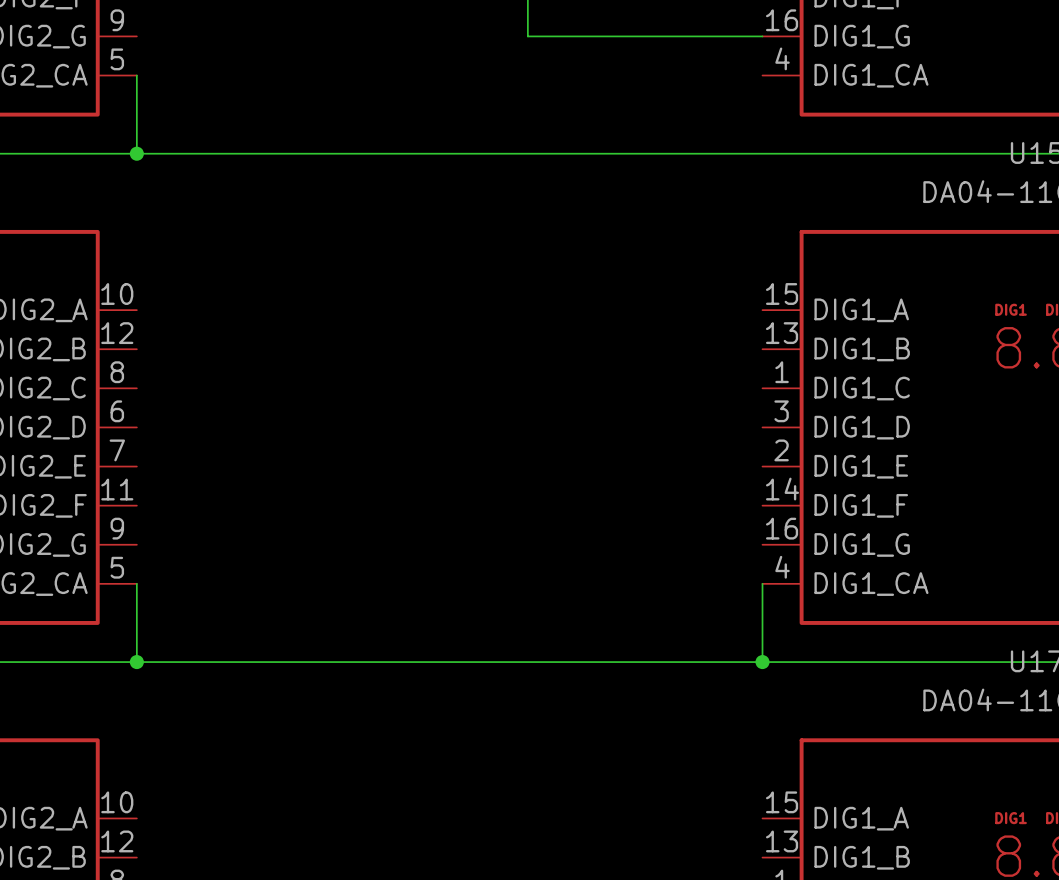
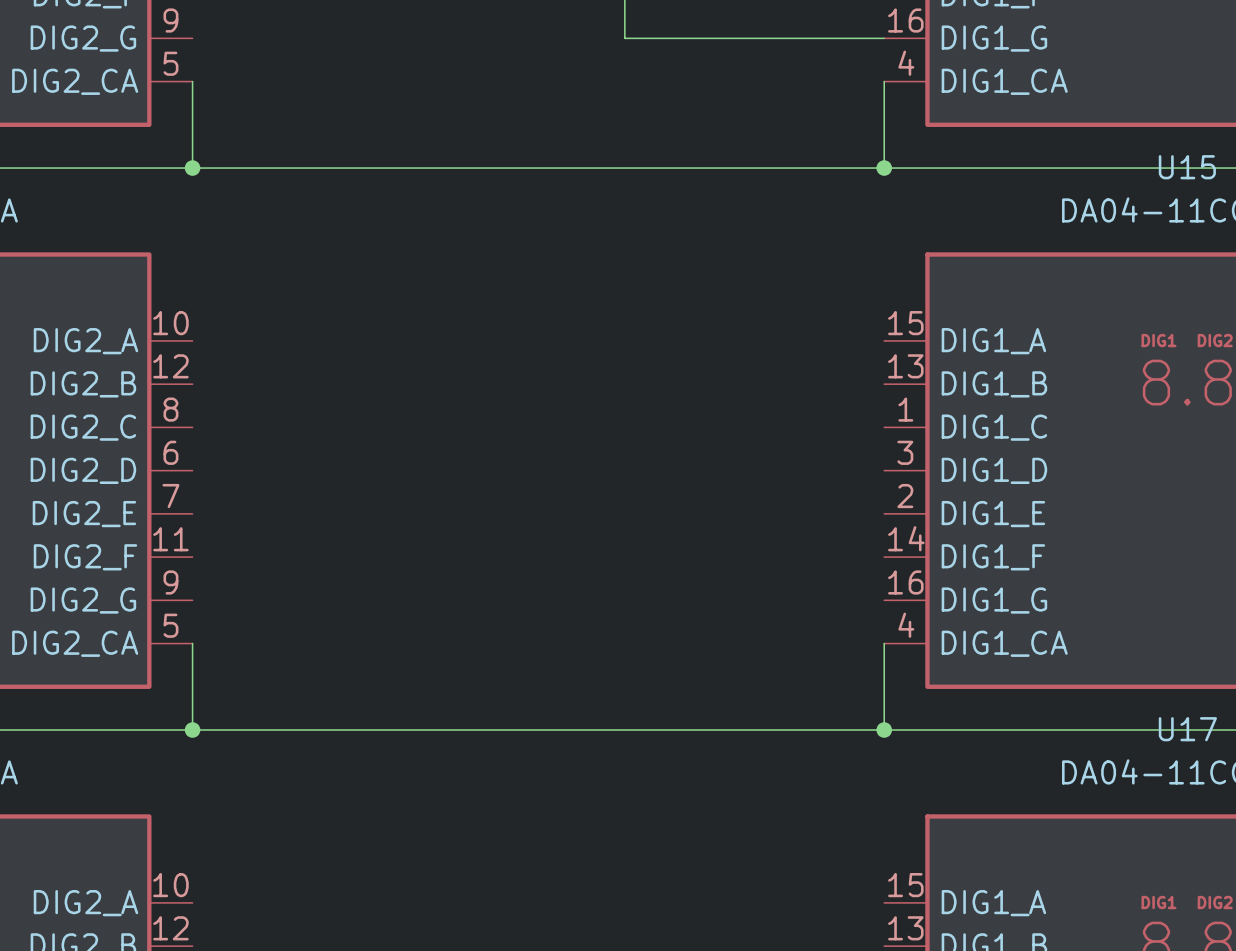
wire: none -> (884, 81) (884, 168)
junction: none -> (884, 168)

